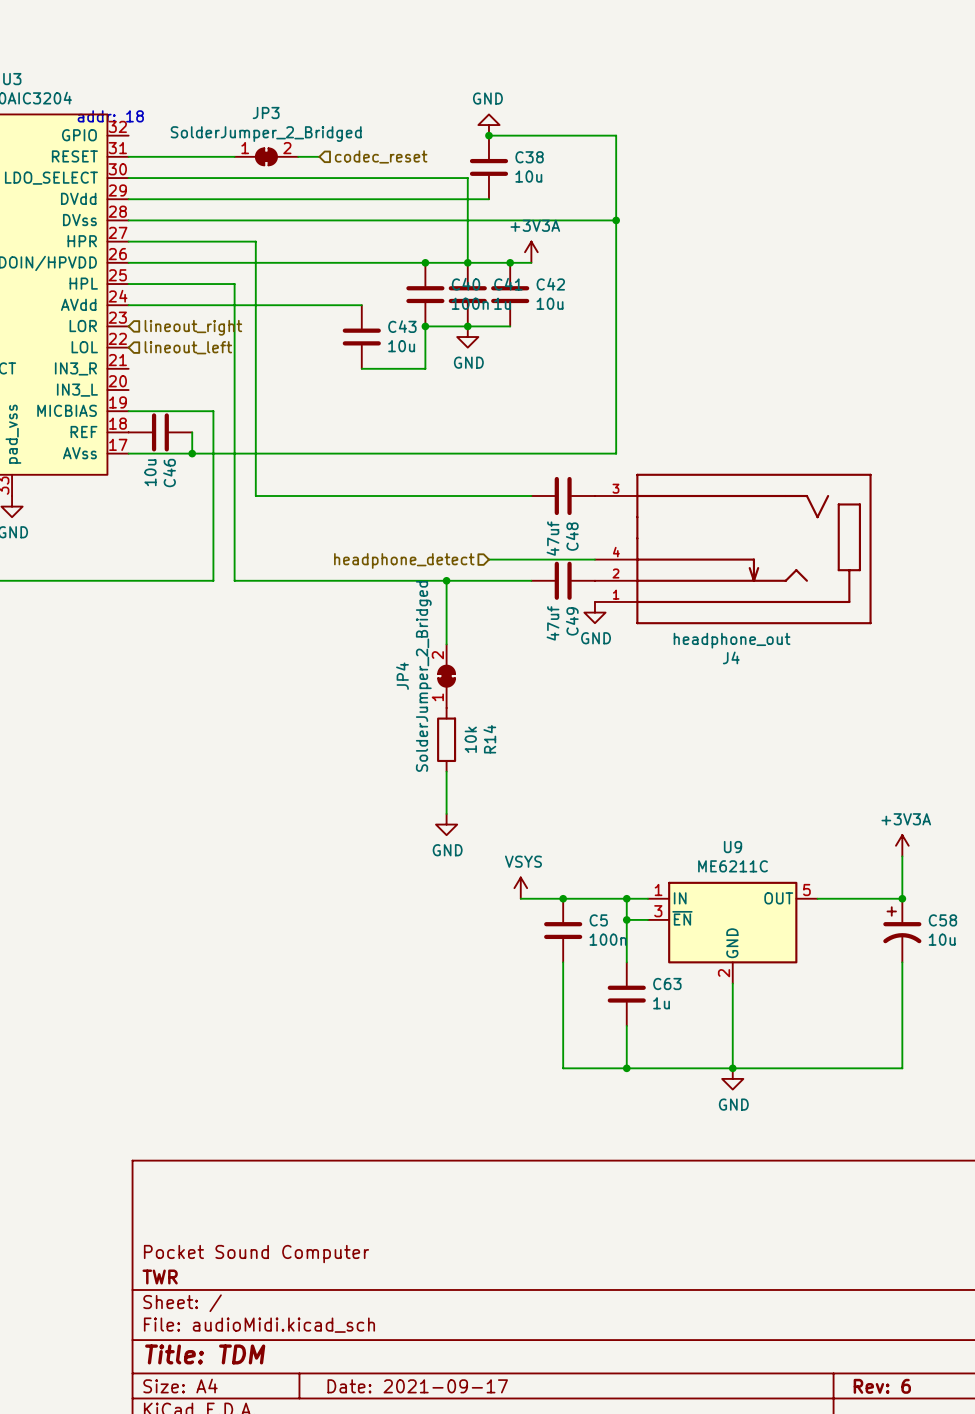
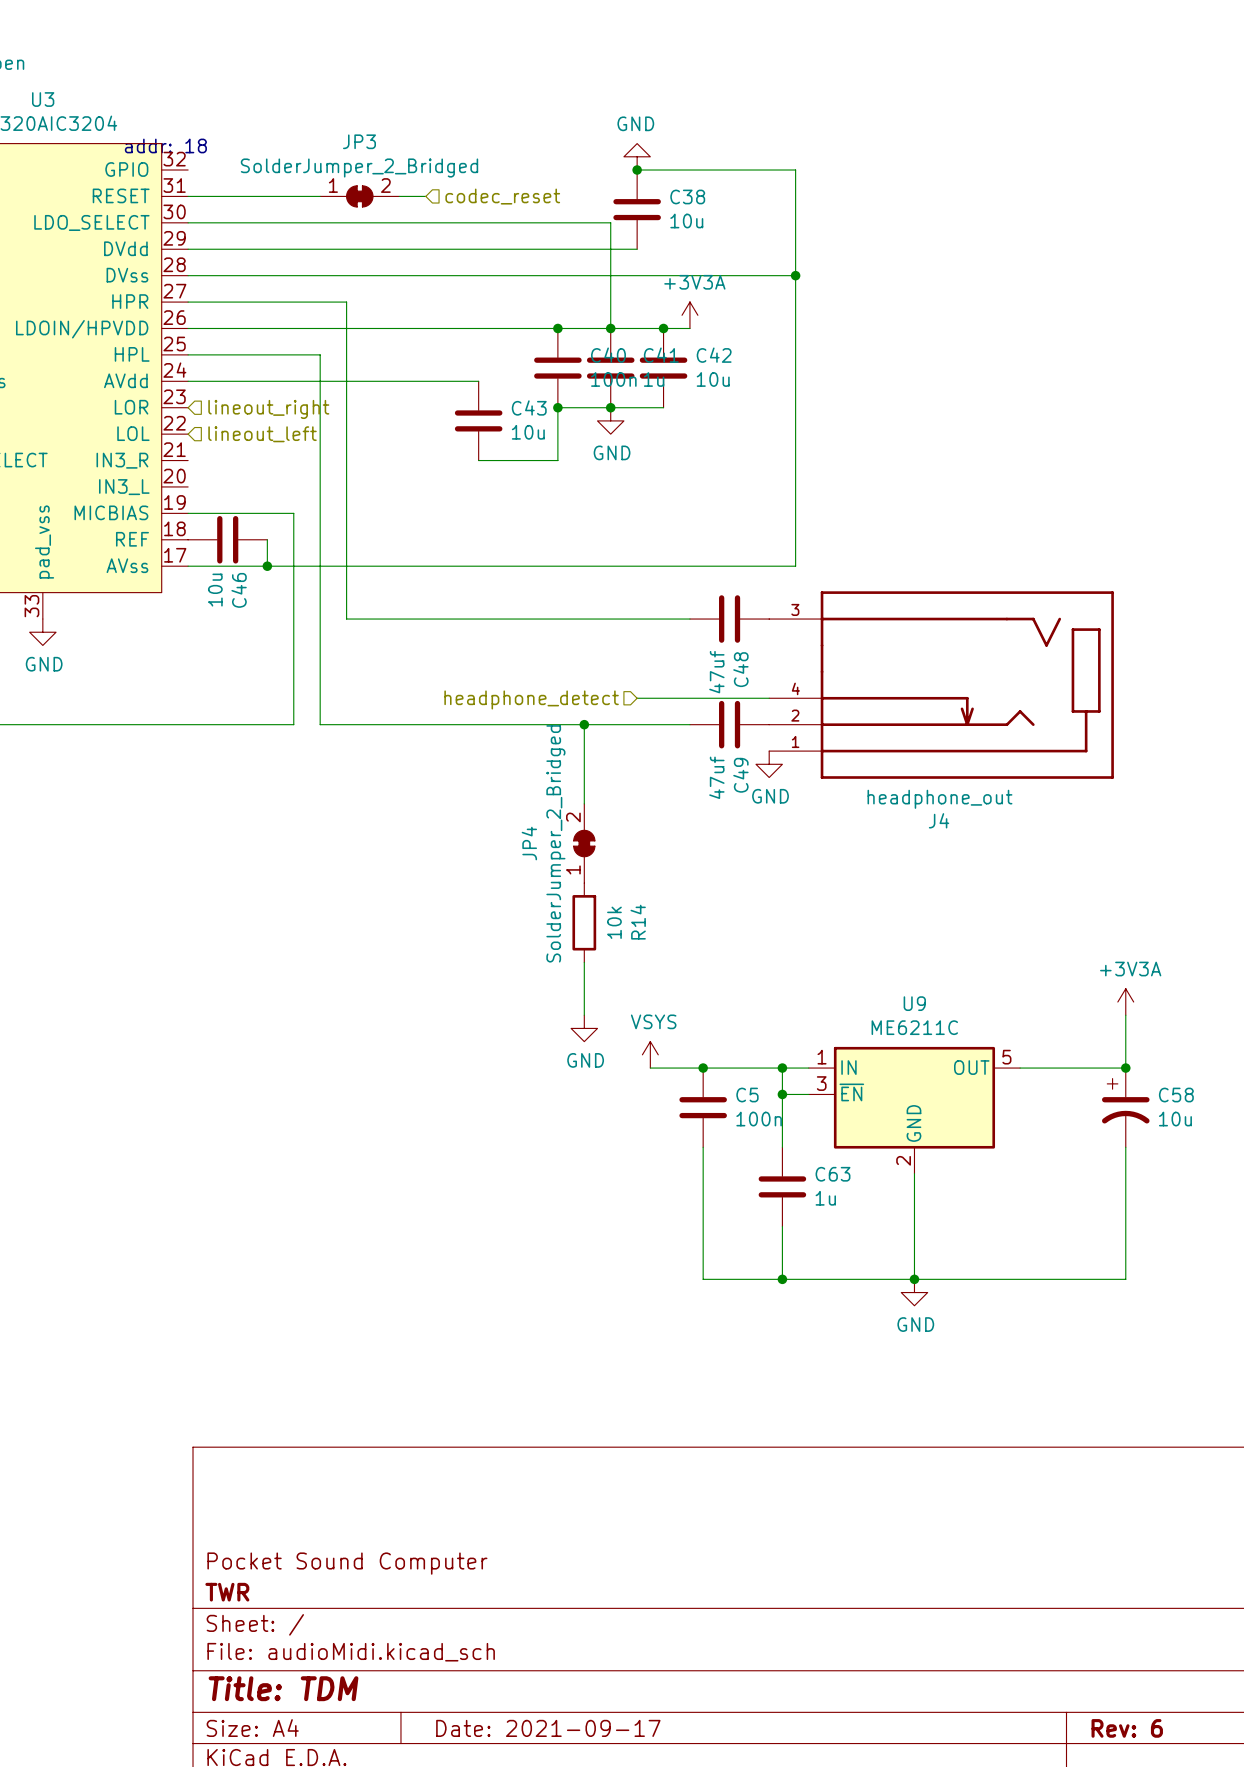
power symbol position: +3V3A (902, 845) -> +3V3A (1125, 1002)
junction: none -> (703, 1068)
junction: none -> (782, 1068)
wire: (902, 856) (902, 898) (817, 898) -> (1125, 1015) (1125, 1068) (1020, 1068)
junction: none -> (782, 1094)
power symbol position: VSYS (520, 888) -> VSYS (650, 1054)
wire: (520, 898) (647, 898) -> (650, 1068) (808, 1068)
junction: (563, 898) -> none
wire: (626, 898) (626, 962) -> (782, 1068) (782, 1147)
junction: (626, 898) -> none
junction position: (902, 898) -> (1125, 1068)
wire: (626, 919) (647, 919) -> (782, 1094) (808, 1094)
junction: (626, 919) -> none
C5 position: (563, 930) -> (703, 1107)
C58 position: (902, 930) -> (1125, 1107)
U9 position: (732, 932) -> (914, 1110)
wire: (563, 962) (563, 1068) (902, 1068) (902, 962) -> (703, 1147) (703, 1279) (1125, 1279) (1125, 1147)
wire: (732, 983) (732, 1068) -> (914, 1173) (914, 1279)
C63 position: (626, 994) -> (782, 1186)
junction: none -> (782, 1279)
wire: (626, 1025) (626, 1068) -> (782, 1226) (782, 1279)
junction: none -> (914, 1279)
junction: (626, 1068) -> none
junction: (732, 1068) -> none
power symbol position: GND (732, 1078) -> GND (914, 1292)

